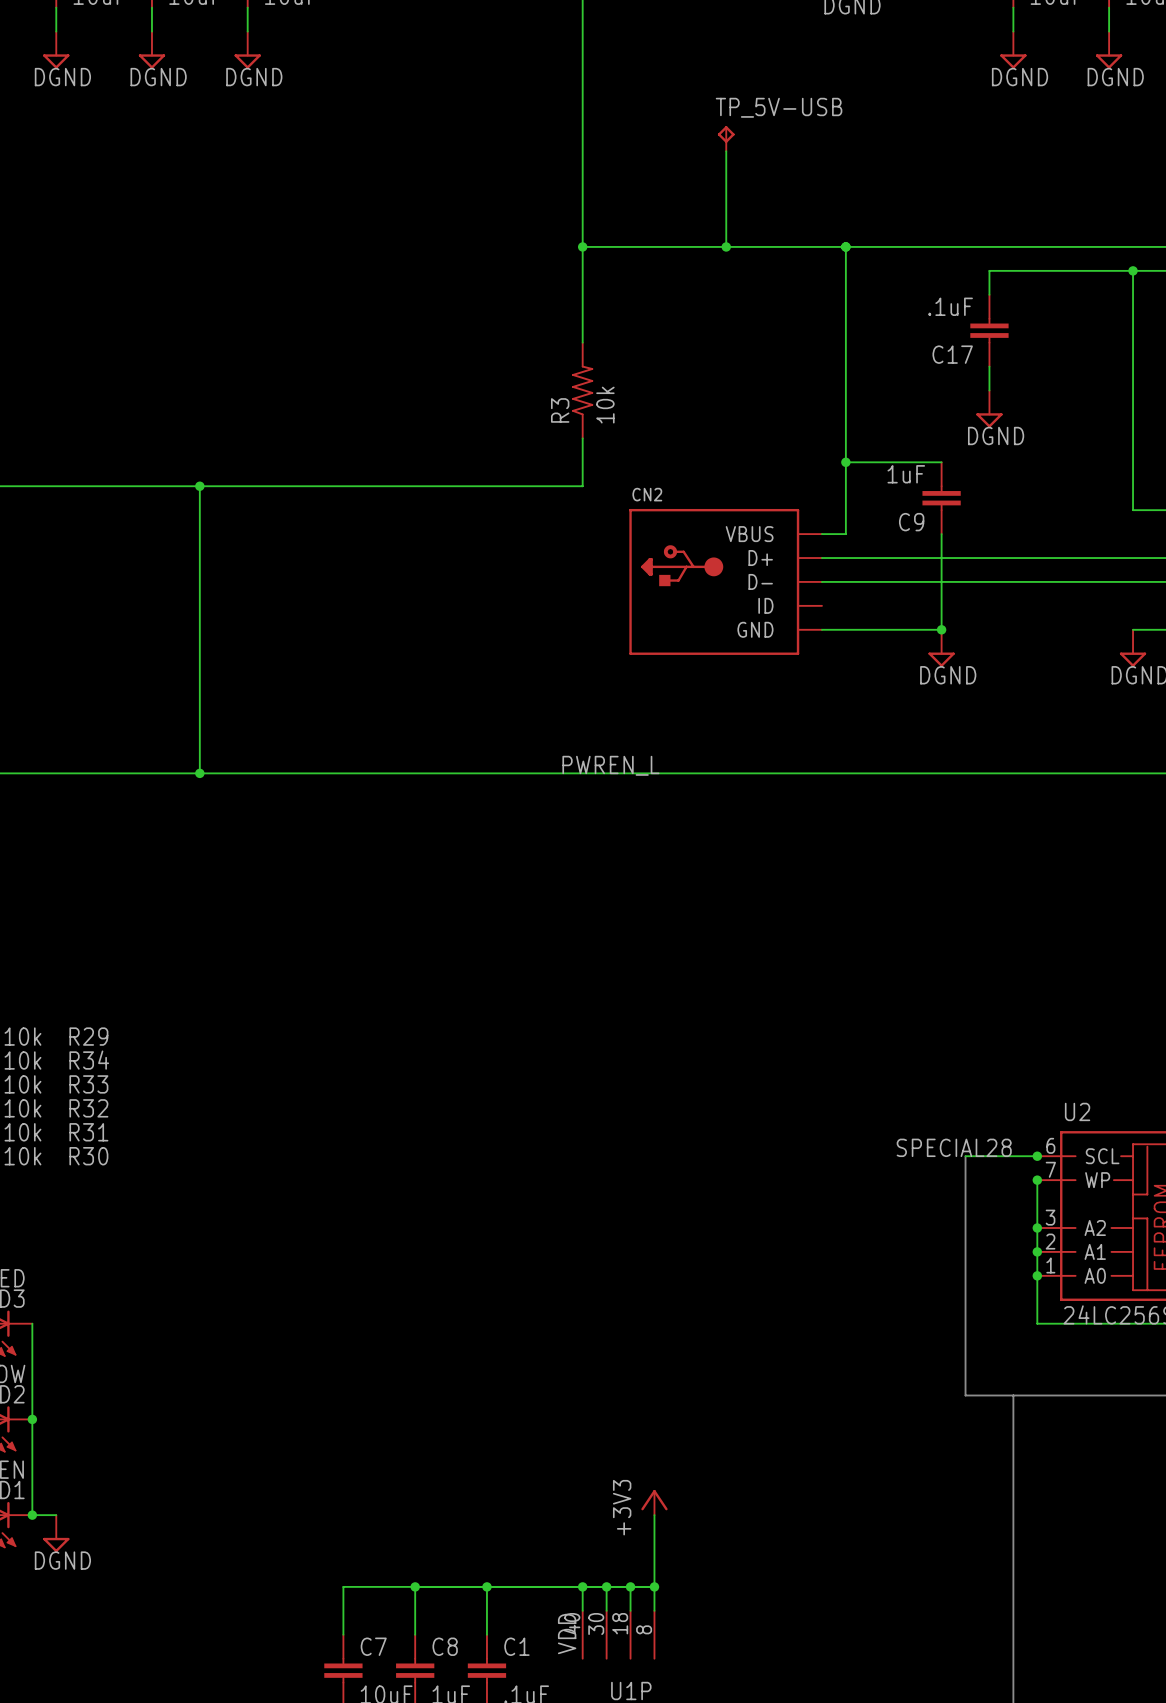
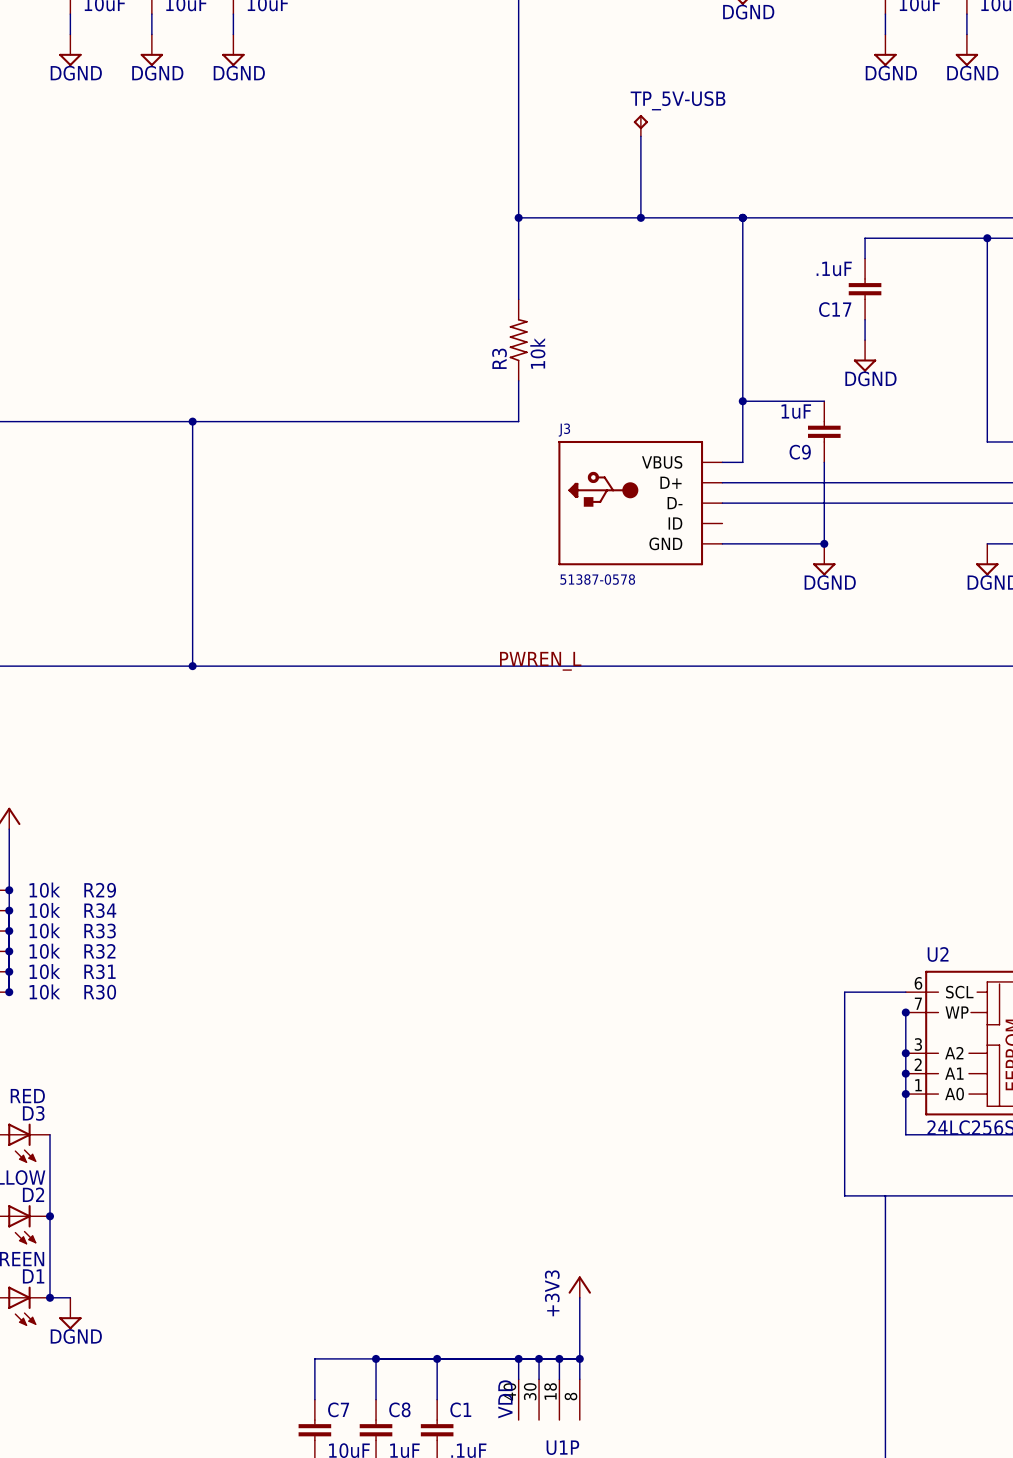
CN2 name: CN2 (647, 494) -> J3 (564, 430)
CN2 value: none -> 51387-0578 (597, 579)
label: SPECIAL28 (954, 1147) -> none
junction: (1037, 1156) -> none

